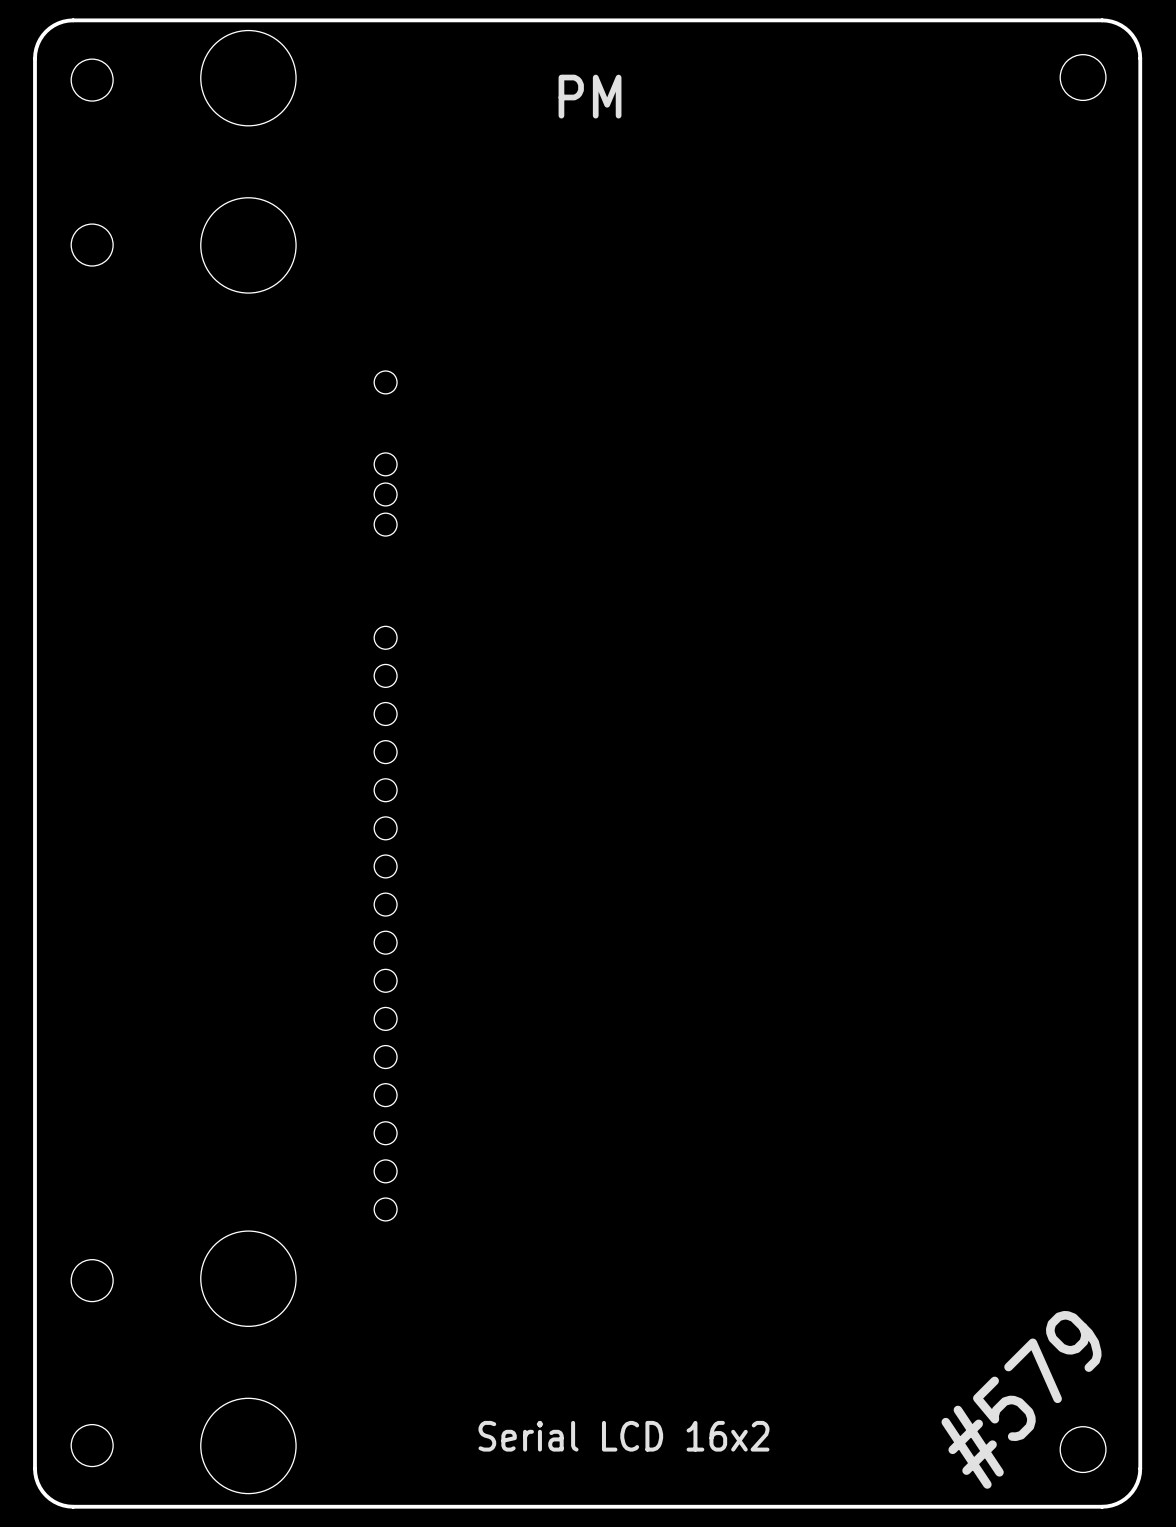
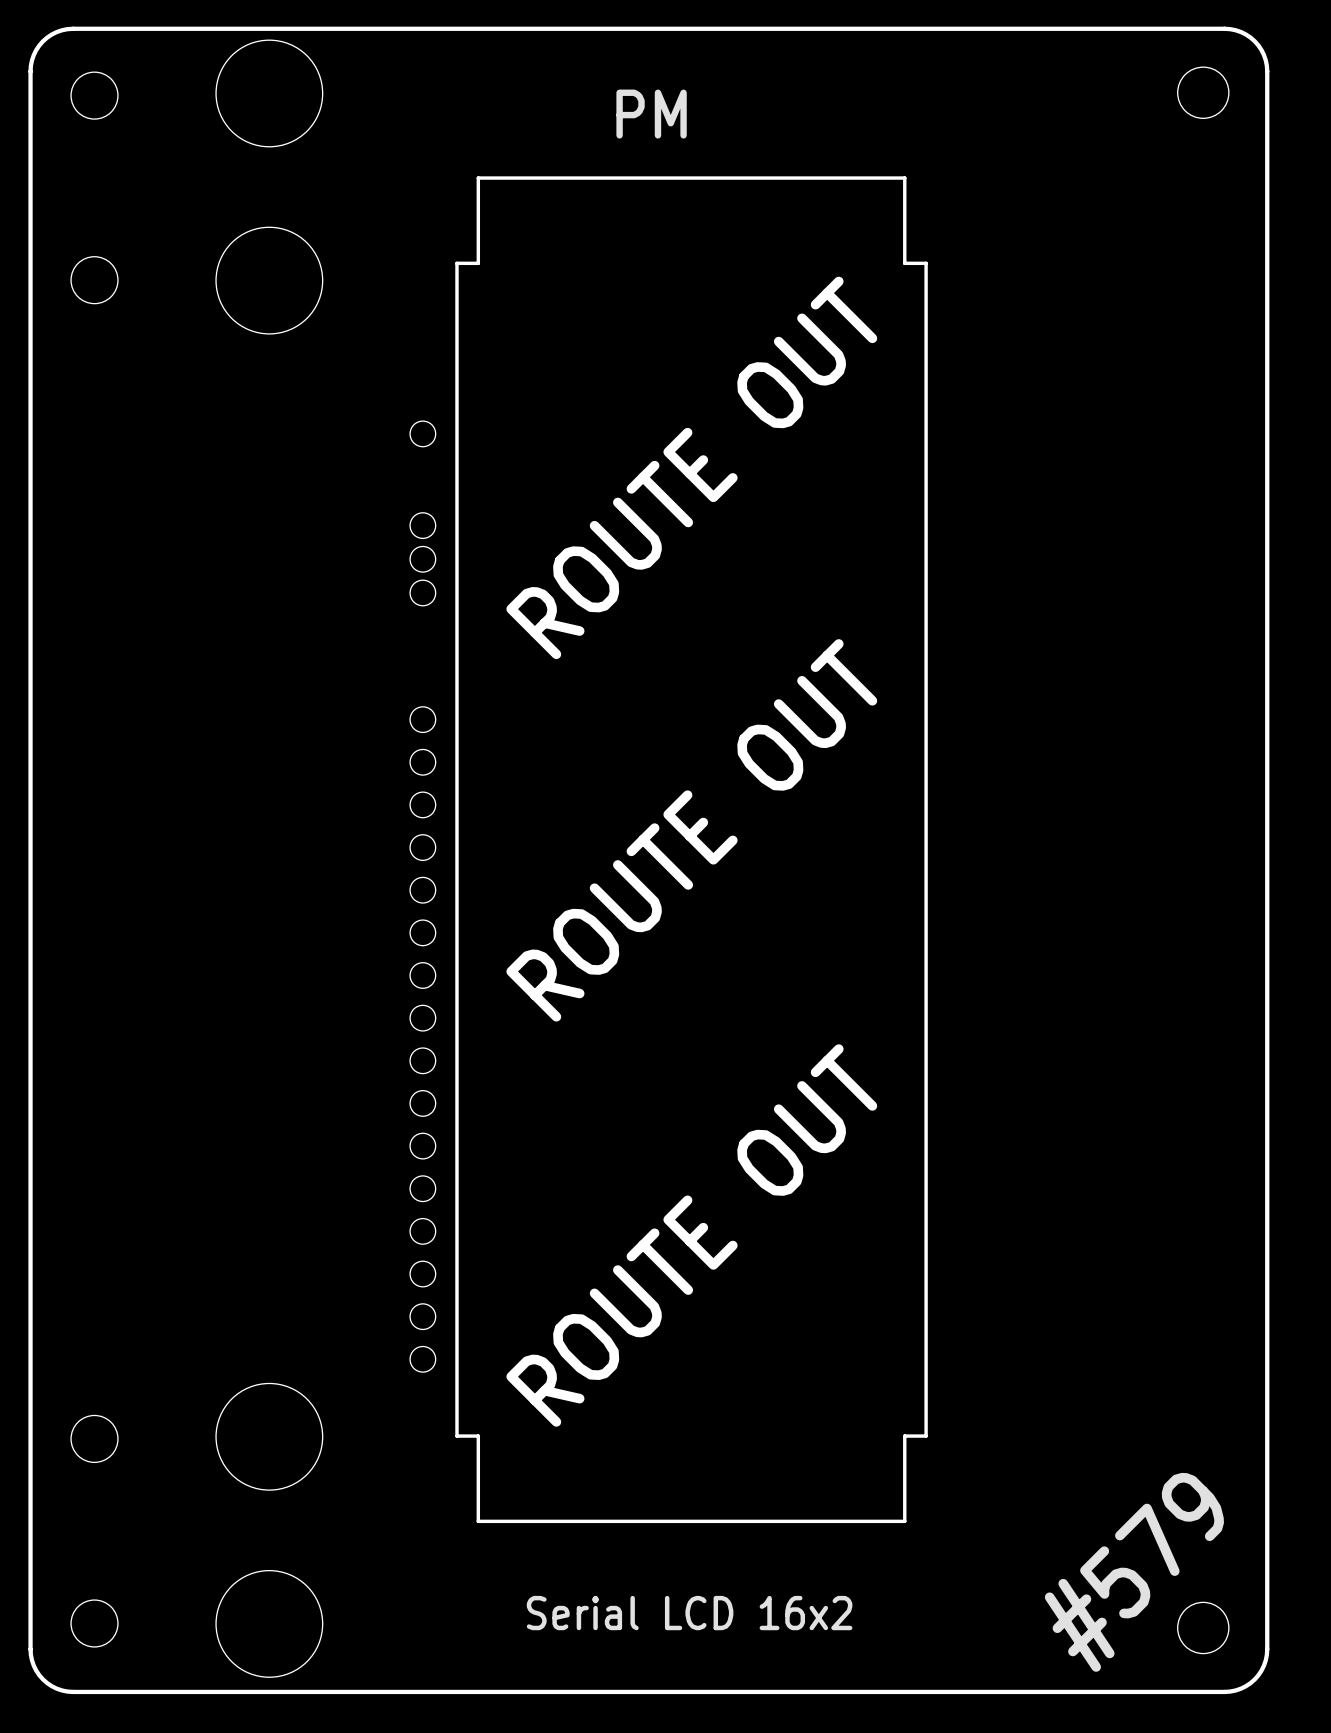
board edge: none -> (478, 178) (904, 178) (904, 263) (926, 263) (926, 1436) (904, 1436) (904, 1521) (478, 1521) (478, 1436) (456, 1436) (456, 263) (478, 263) (478, 178)
text: none -> ROUTE OUT (691, 467)
text: none -> ROUTE OUT (691, 830)
text: none -> ROUTE OUT (691, 1235)

